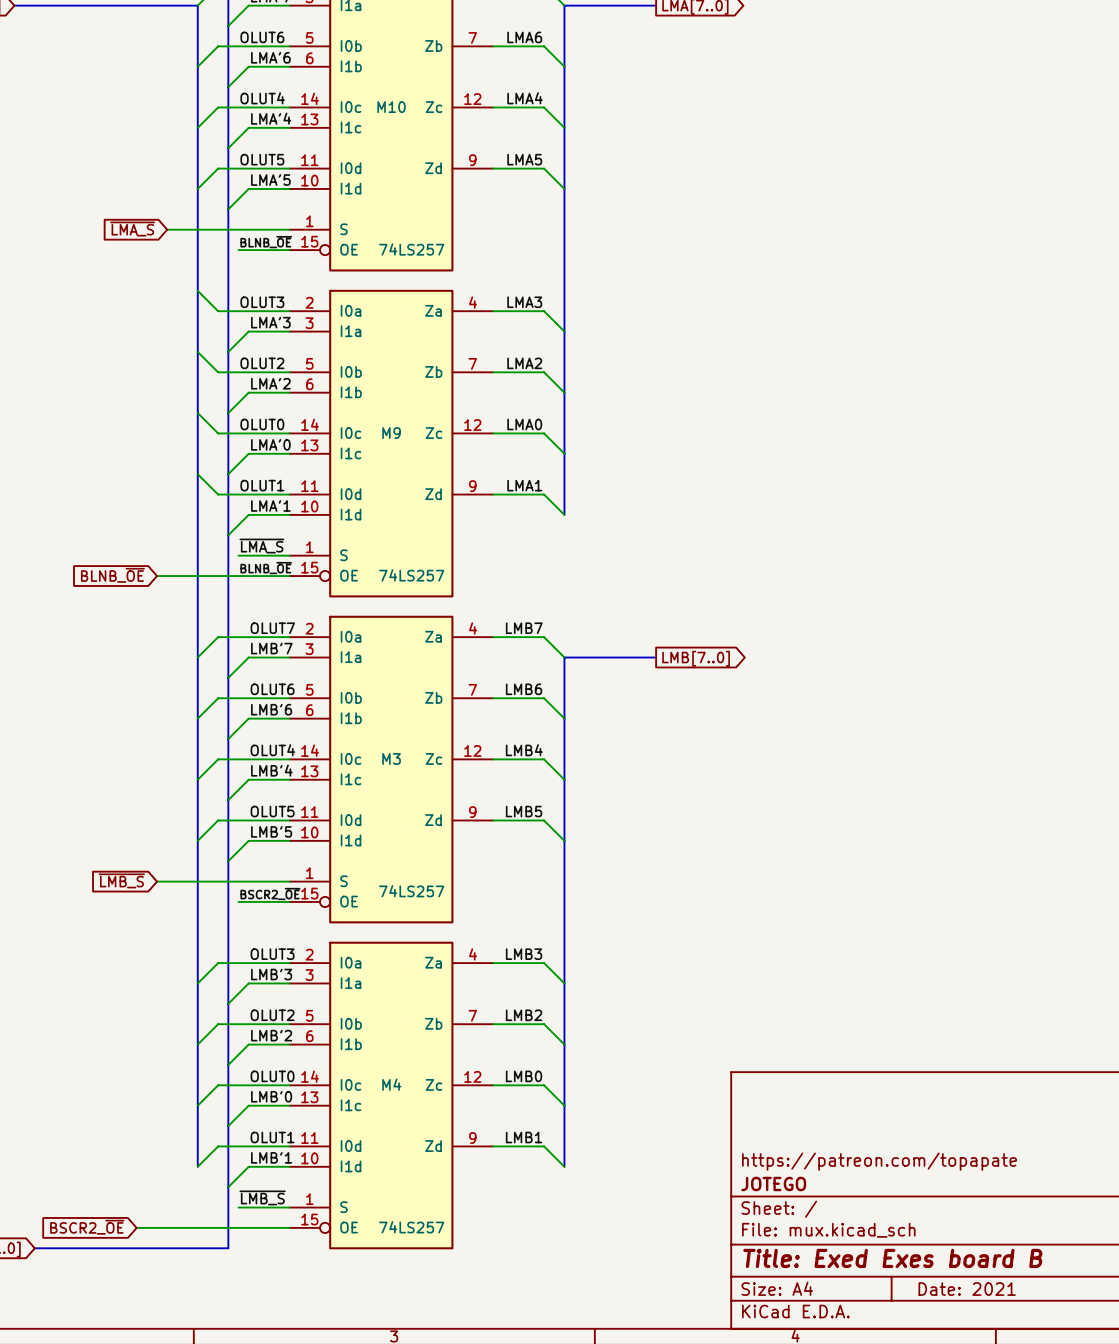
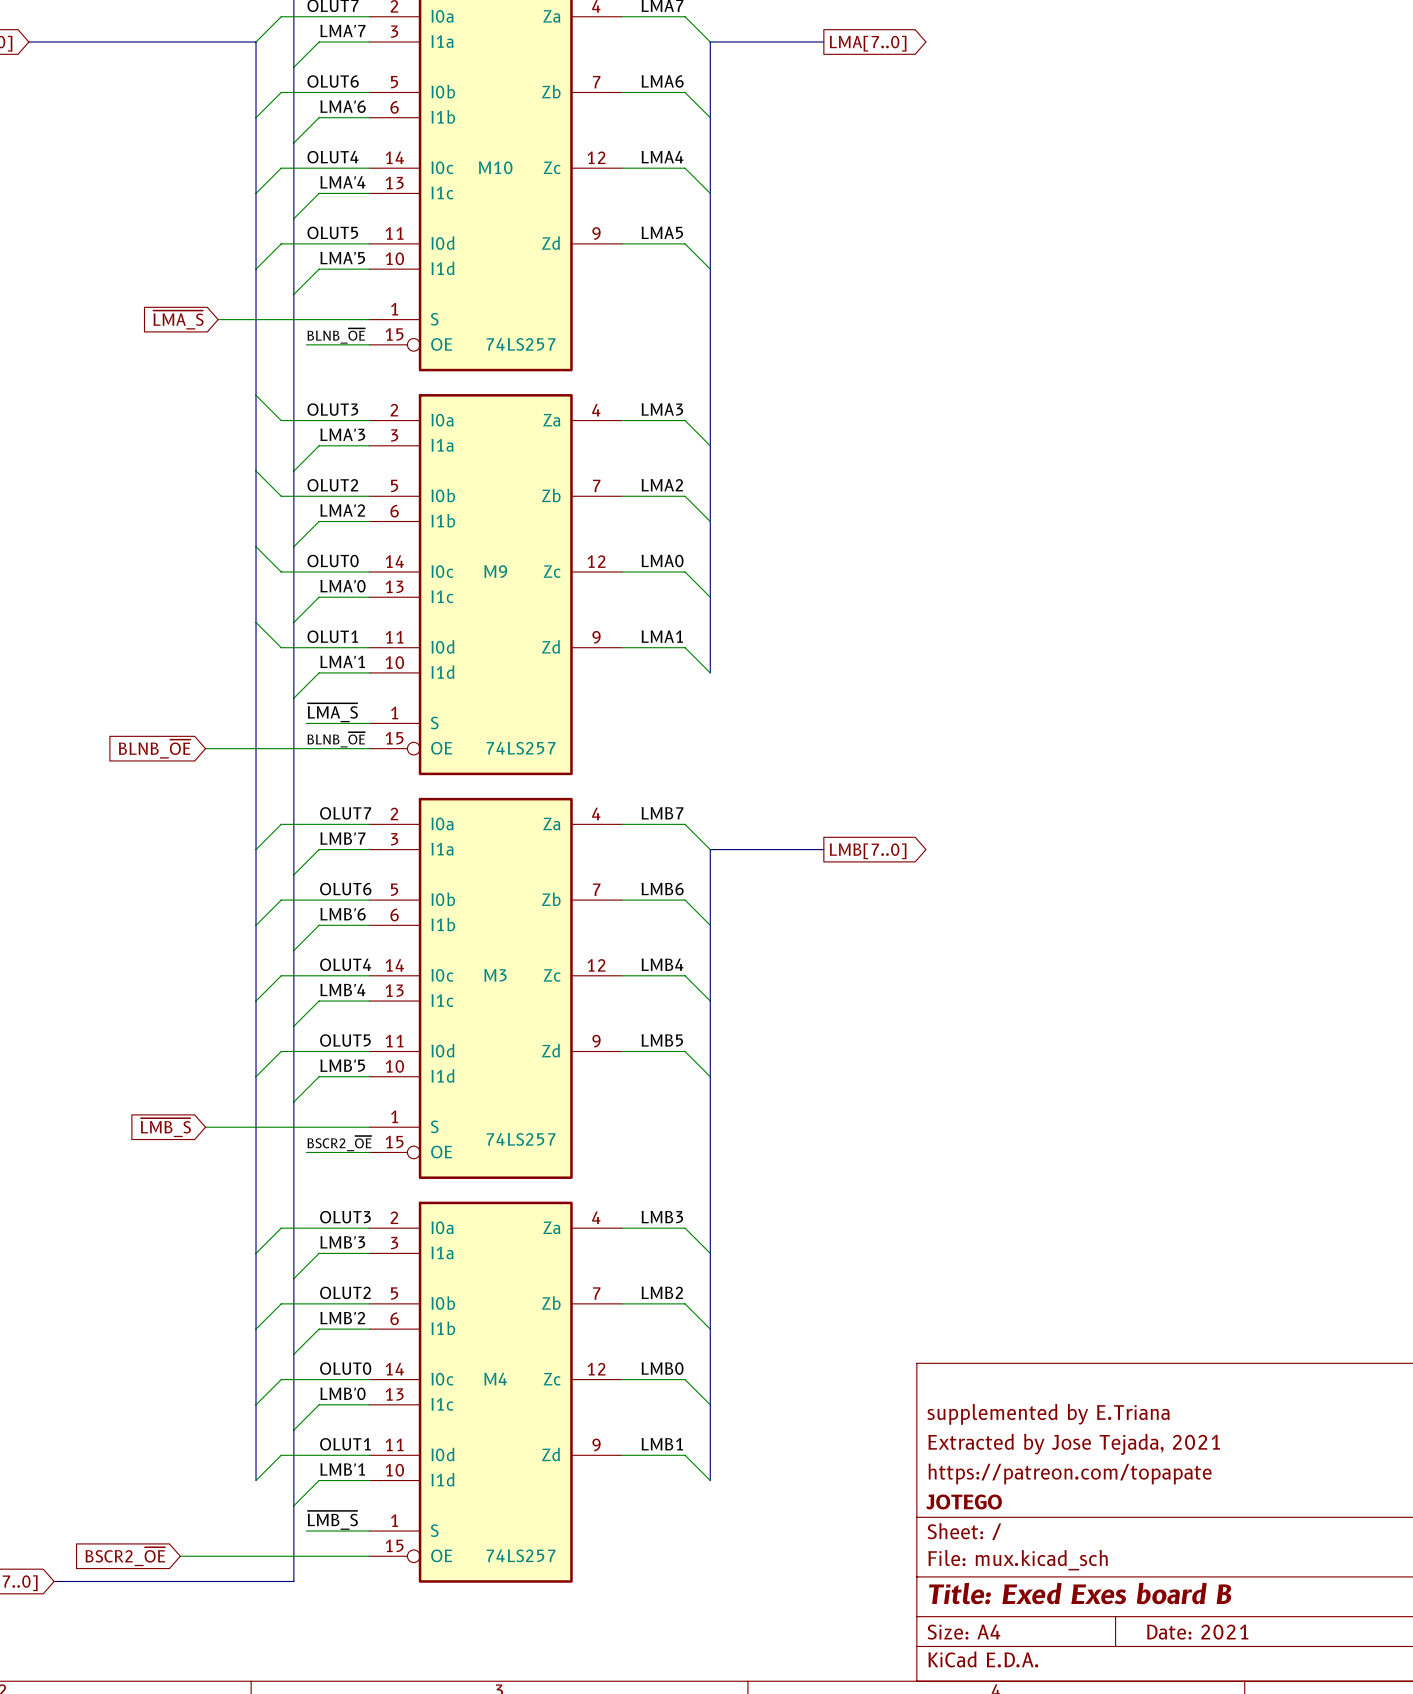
title block: none -> supplemented by E.Triana (1048, 1414)
title block: none -> Extracted by Jose Tejada, 2021 (1074, 1444)

